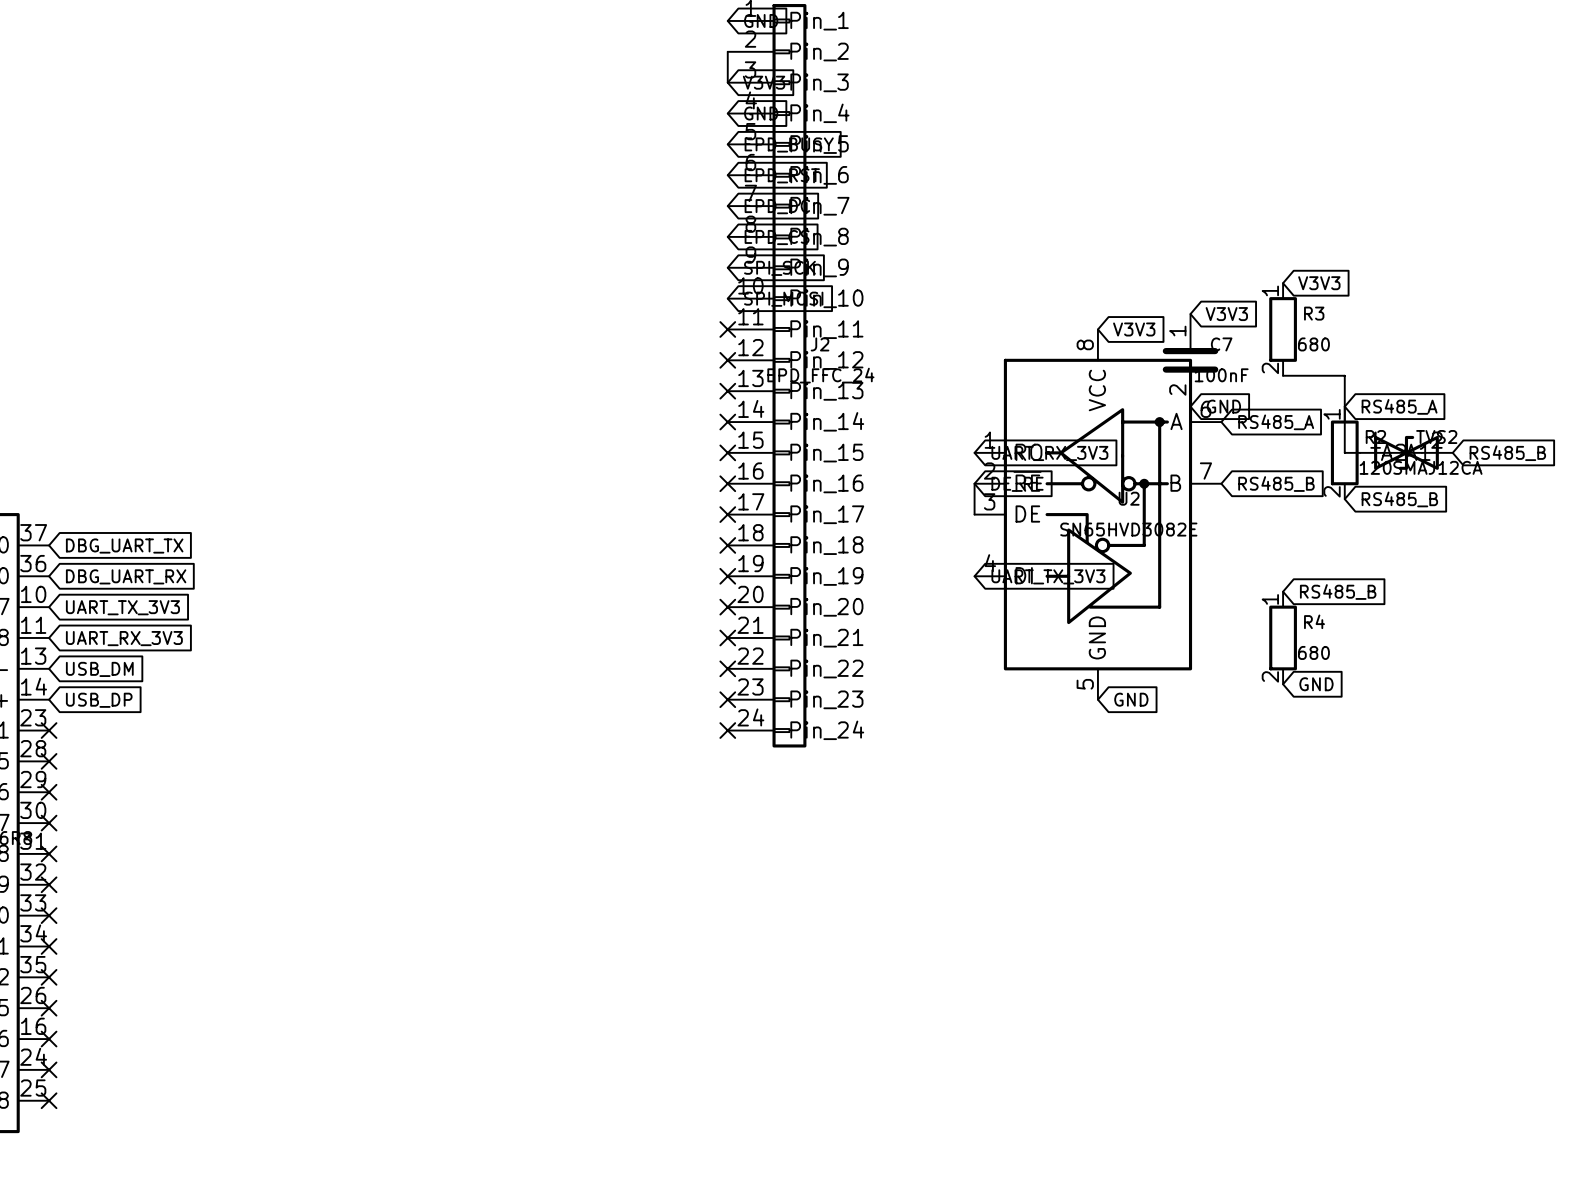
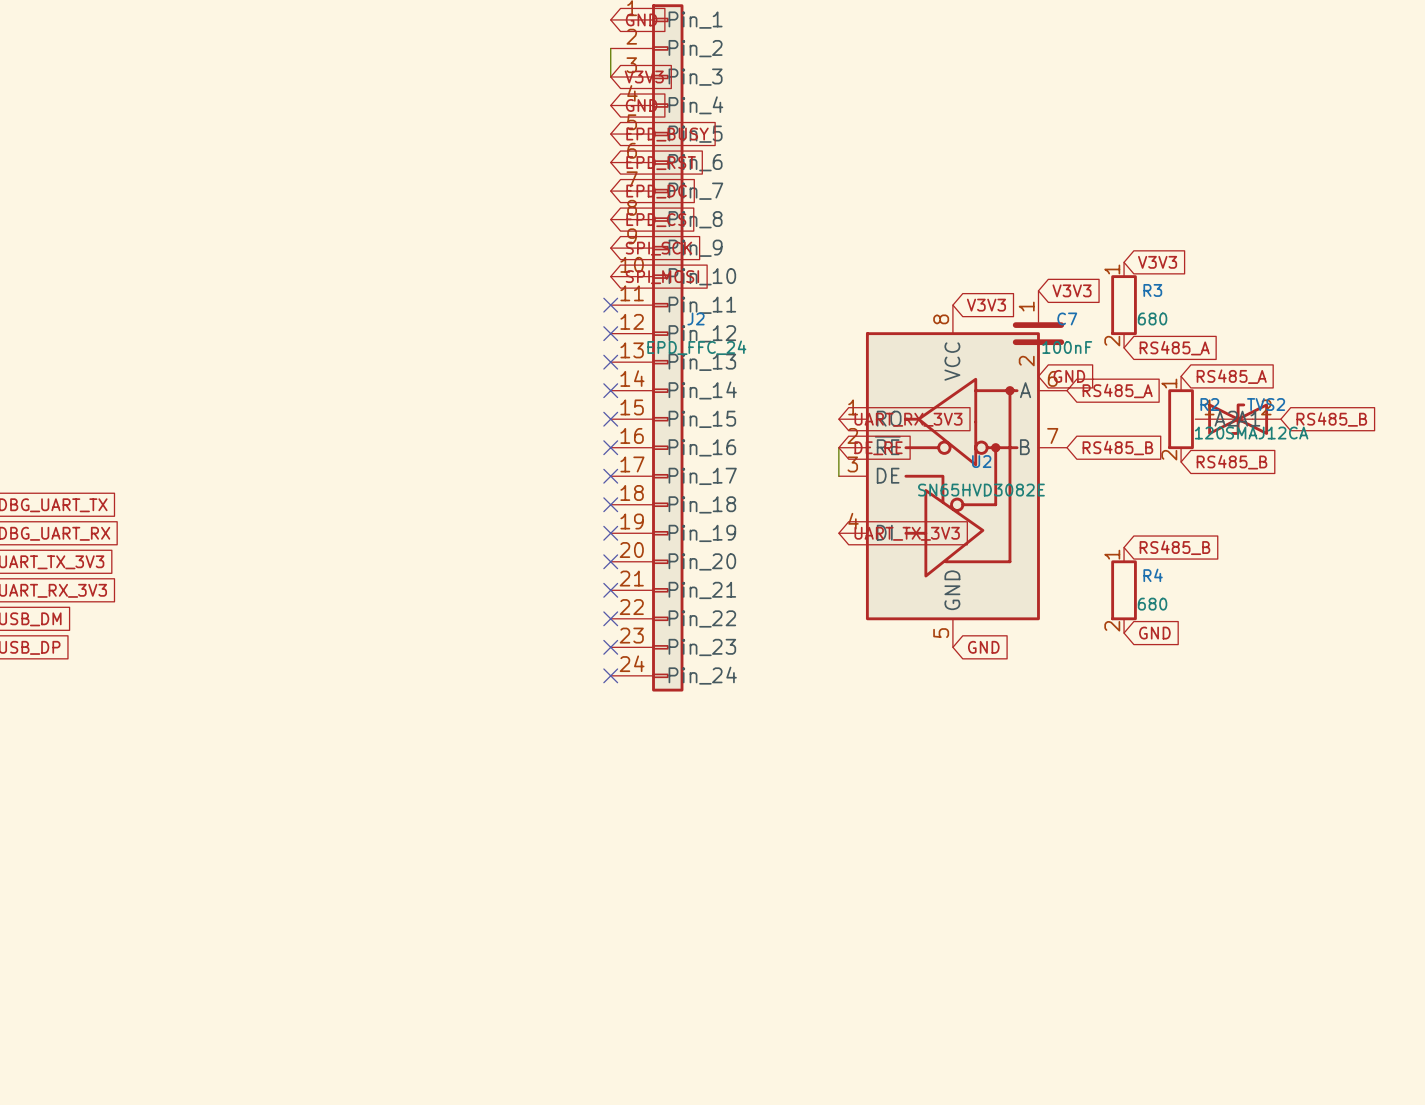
wire: (1283, 375) (1344, 375) (1344, 452) (1360, 452) -> none
global label: none -> RS485_A (1174, 348)

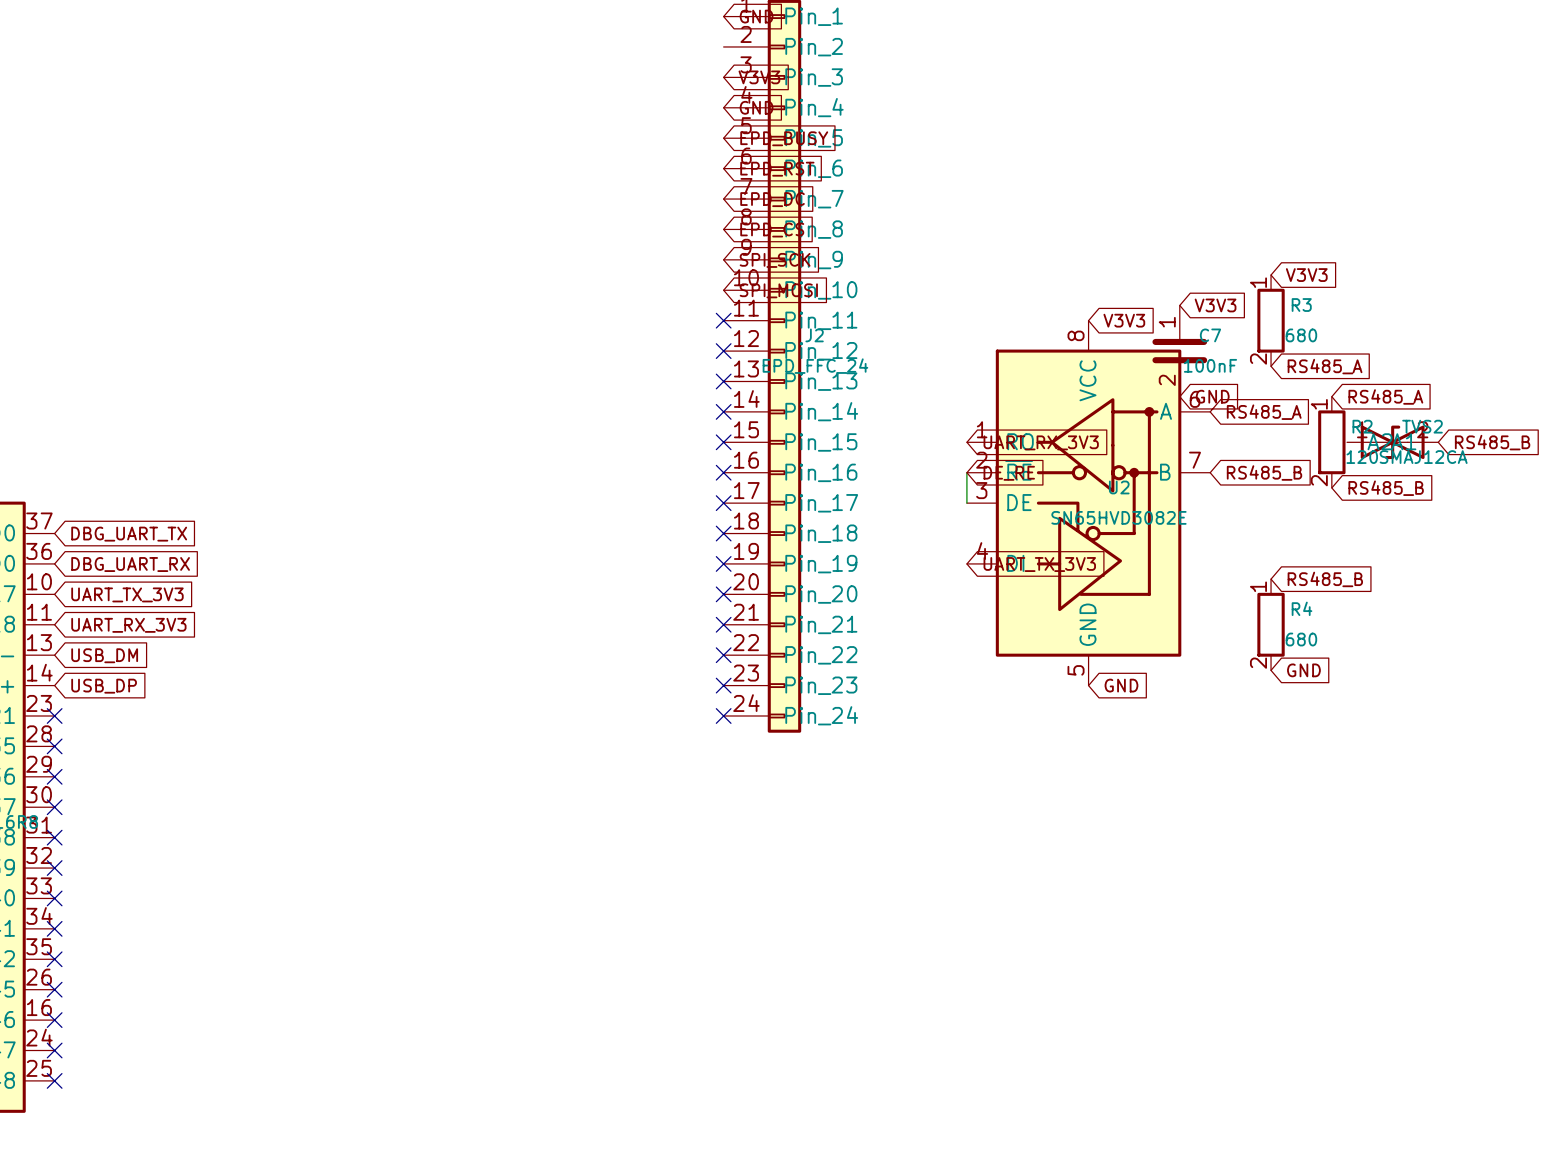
wire: (610, 48) (610, 76) -> none

